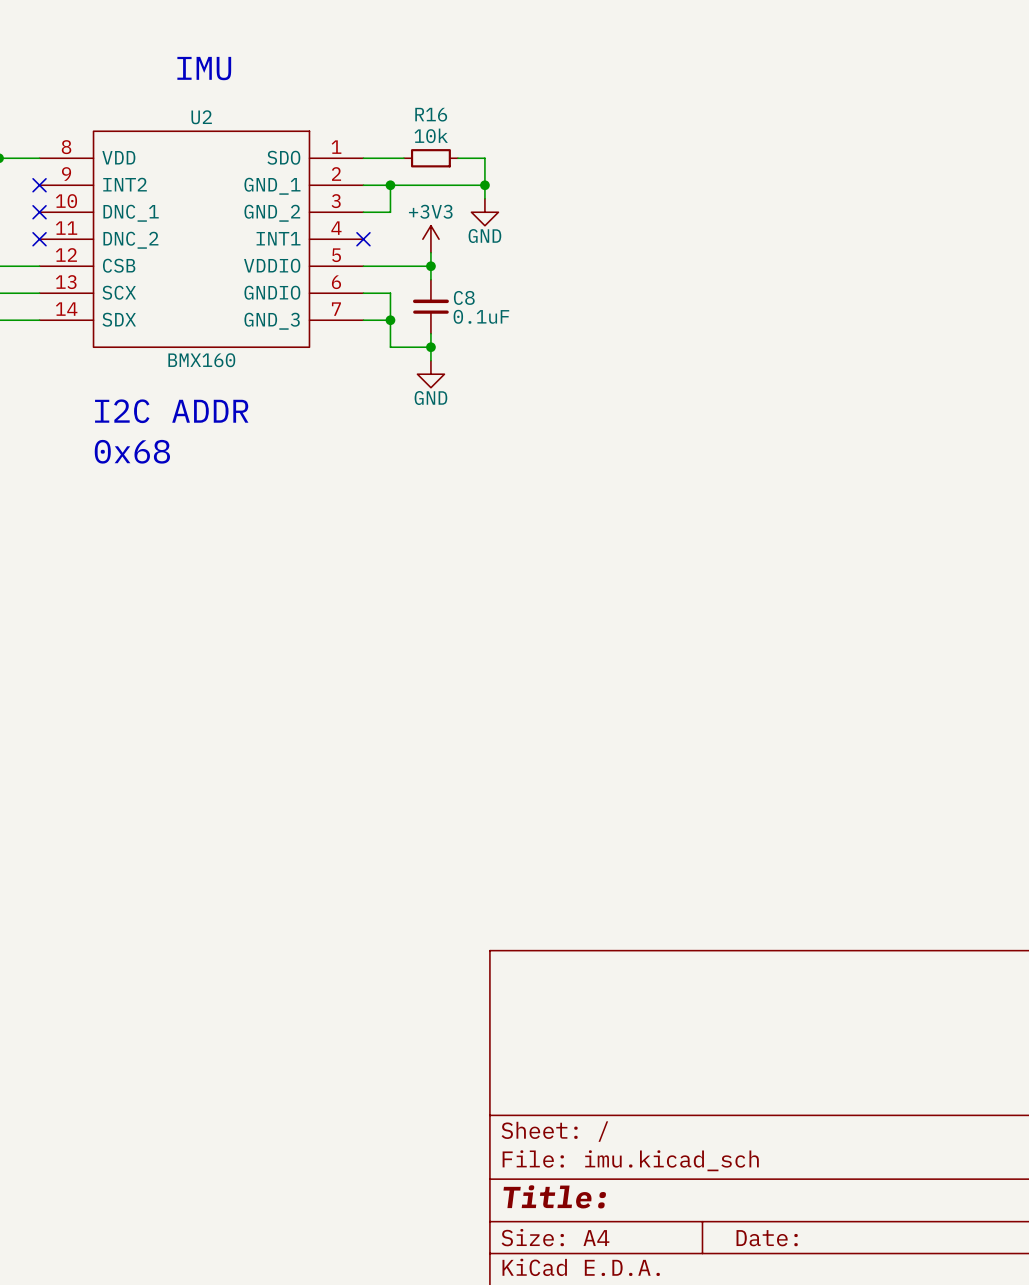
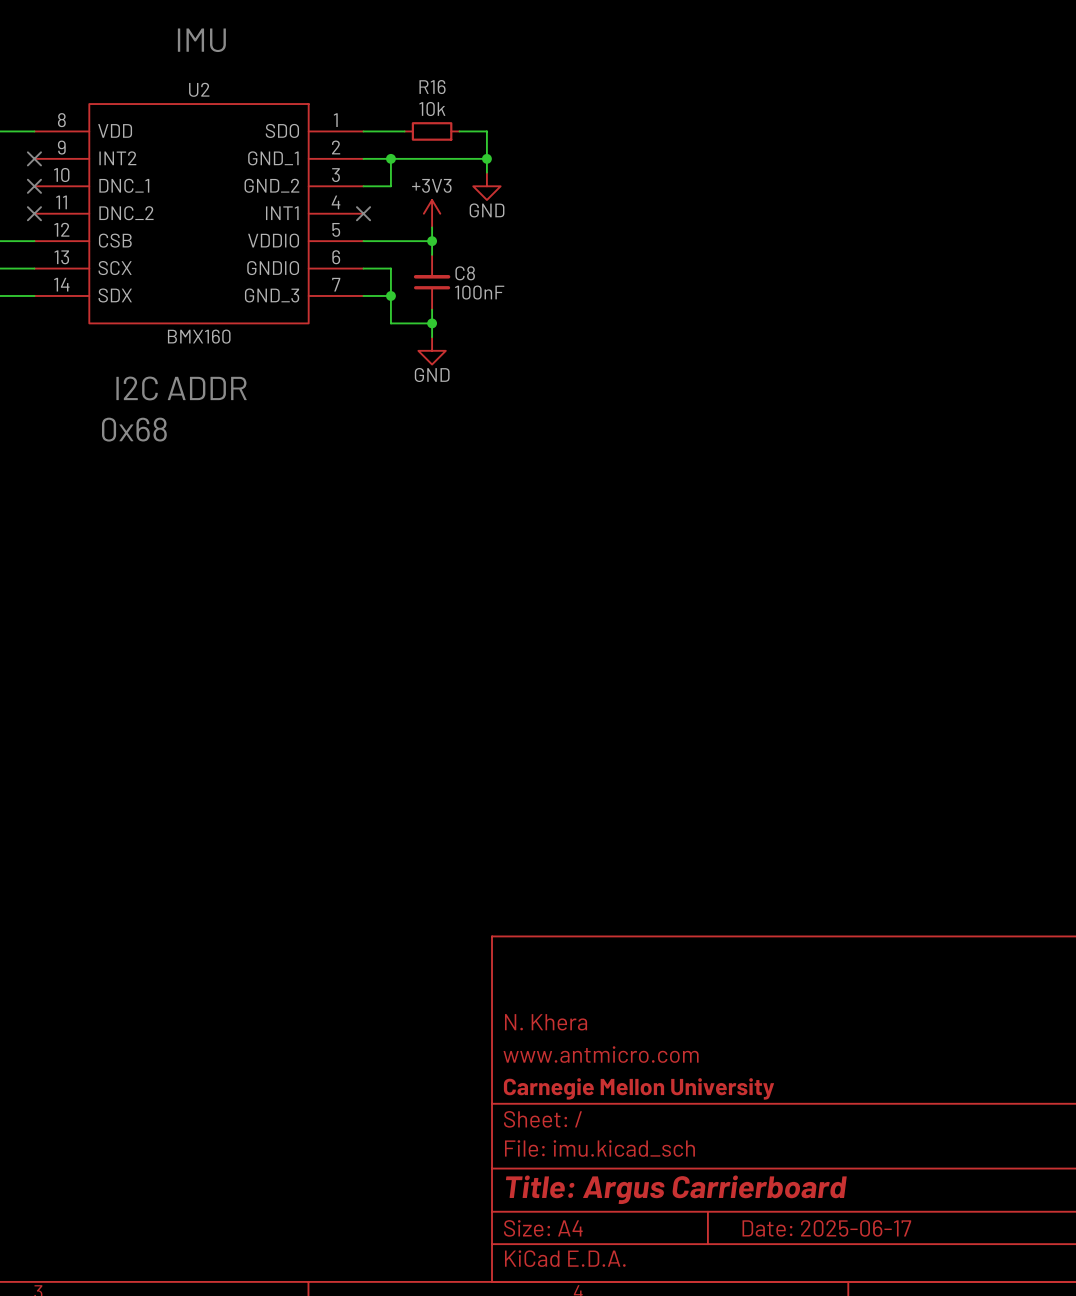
C8 value: 0.1uF (481, 316) -> 100nF (479, 292)
title block: none -> N. Khera (546, 1022)
title block: none -> www.antmicro.com (601, 1054)
title block: none -> Carnegie Mellon University (639, 1088)
title block: Title: (554, 1196) -> Title: Argus Carrierboard (676, 1189)
title block: Date: (767, 1238) -> Date: 2025-06-17 (826, 1228)

